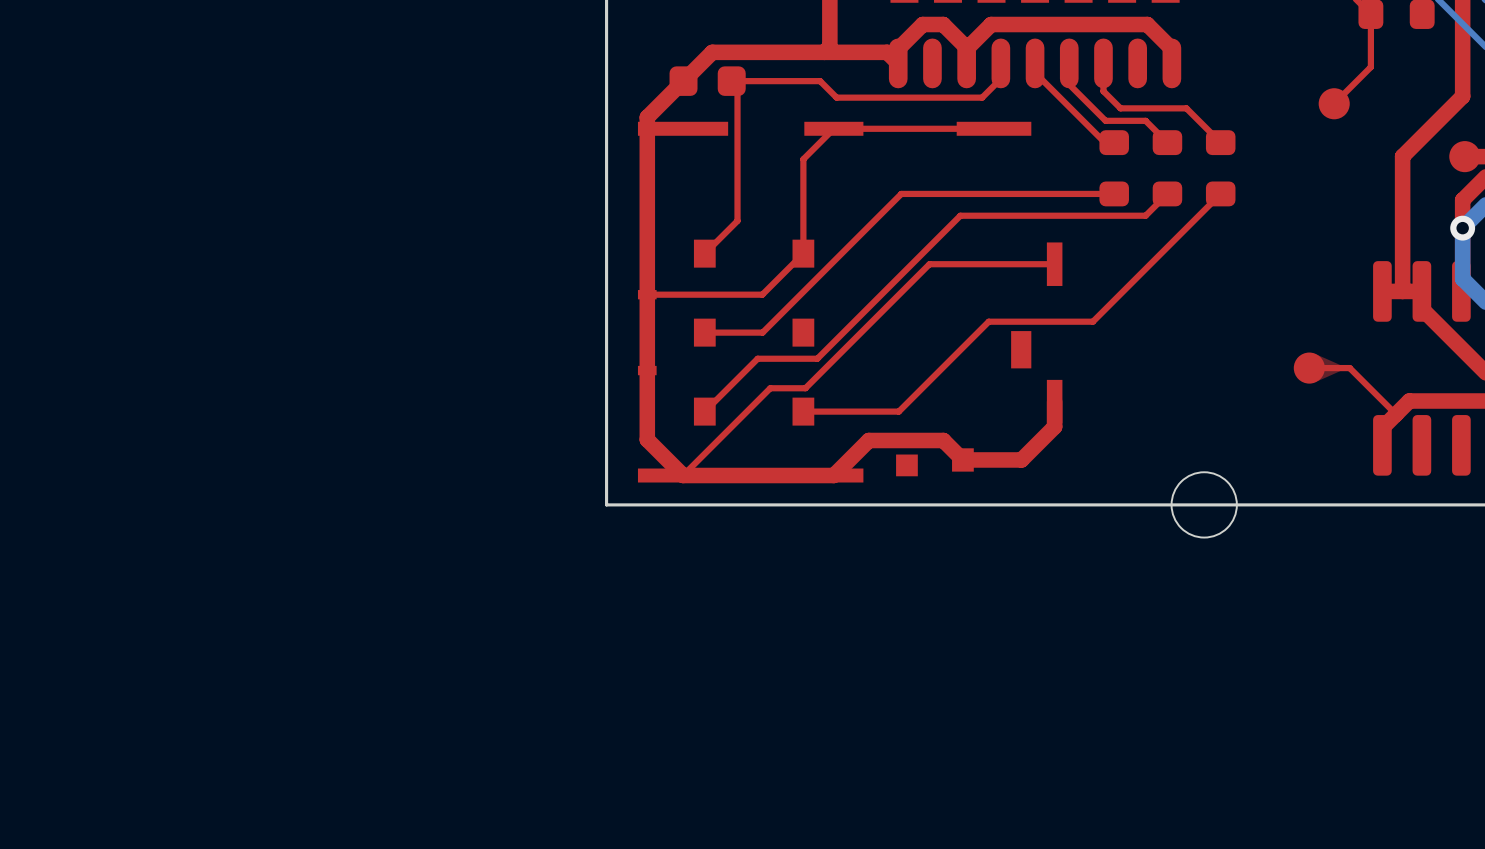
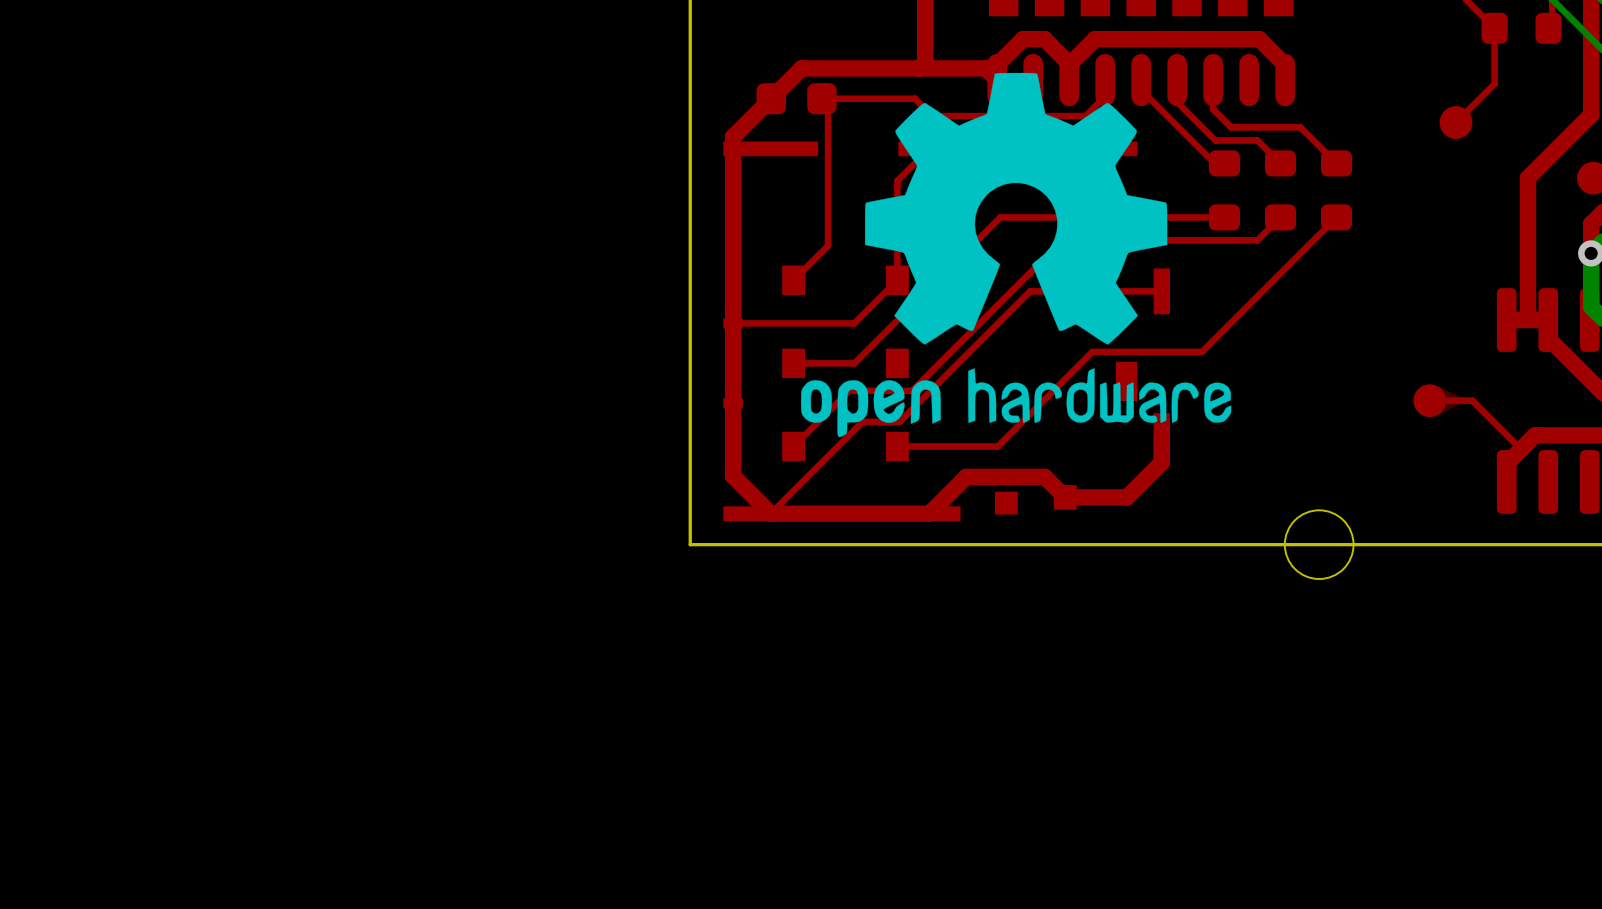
drawing: none -> [801, 72, 1232, 438]

